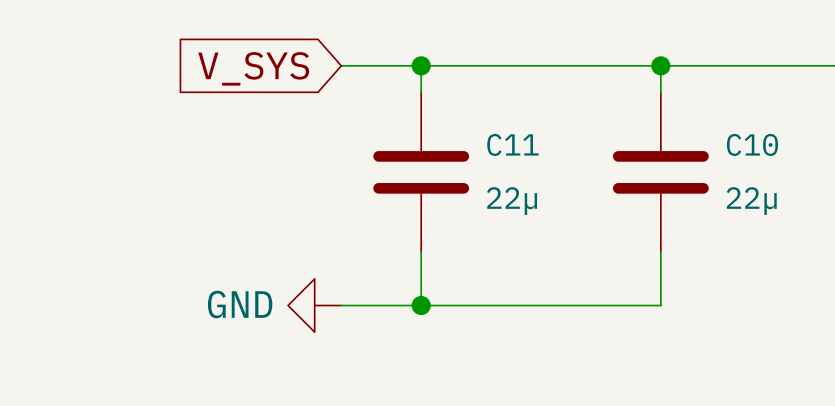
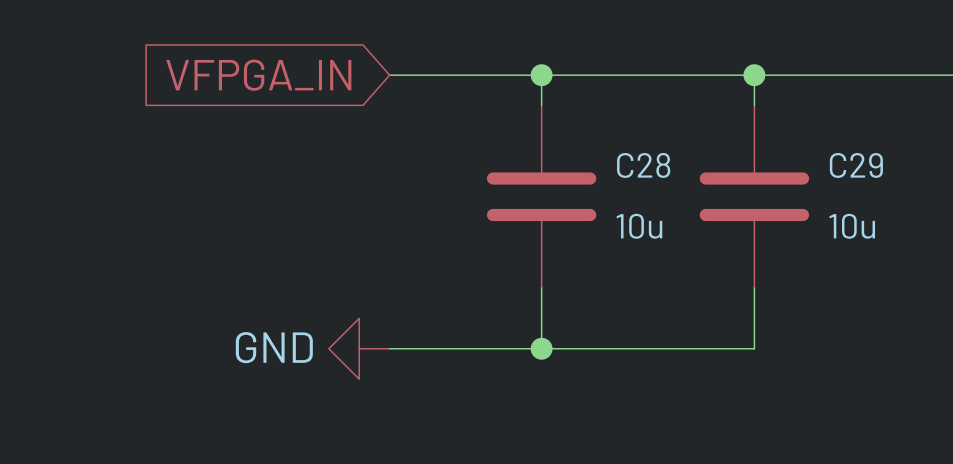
wire: (421, 65) (421, 92) -> (541, 75) (541, 105)
junction position: (421, 65) -> (541, 75)
global label: V_SYS (253, 68) -> VFPGA_IN (258, 75)
C10 name: C10 (752, 144) -> C29 (856, 165)
C11: 22µ (421, 172) -> none
C28: none -> 10u (541, 196)
C10 value: 22µ (751, 201) -> 10u (852, 226)
wire: (421, 252) (421, 305) -> (541, 287) (541, 348)
junction position: (421, 305) -> (541, 348)

